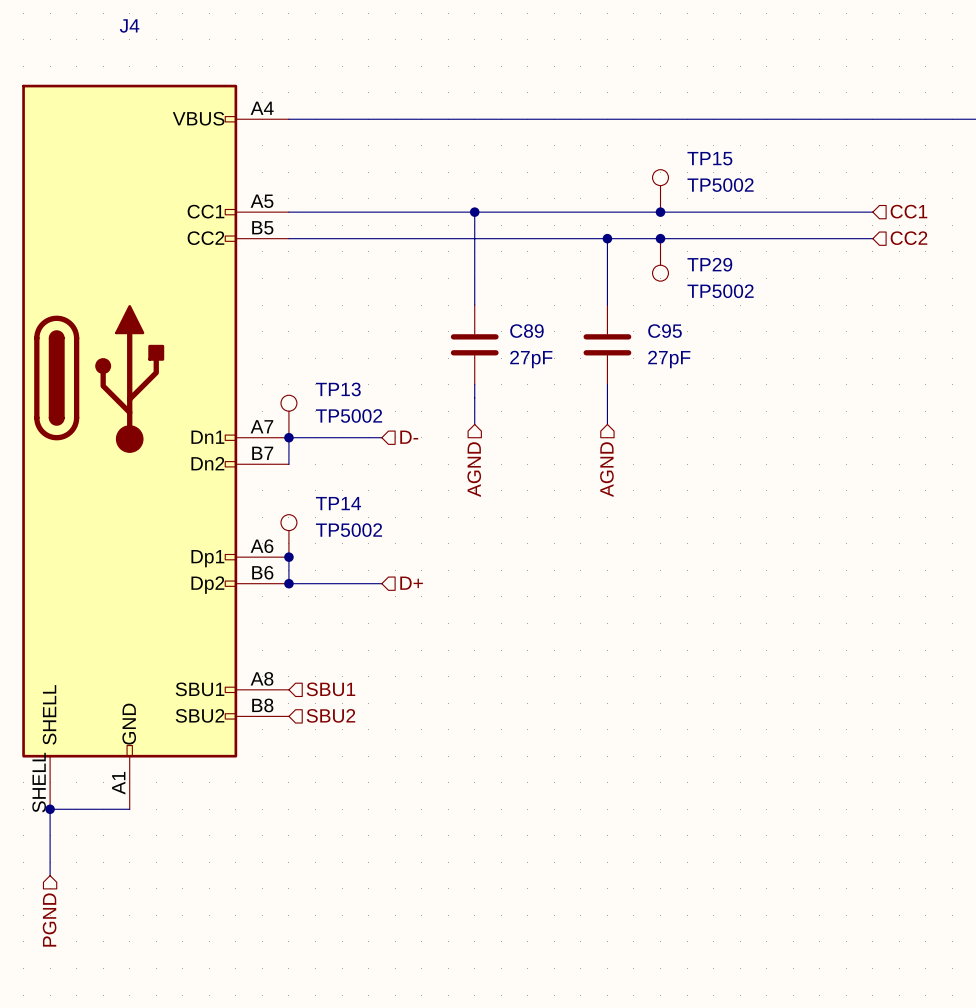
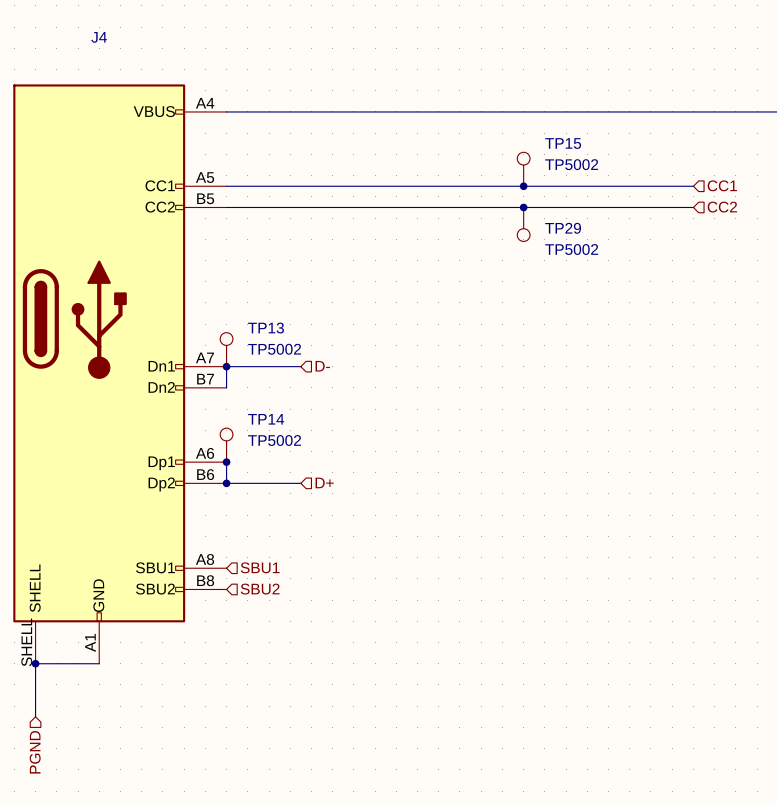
wire: (474, 212) (474, 305) -> none
junction: (474, 212) -> none
wire: (607, 238) (607, 305) -> none
junction: (607, 238) -> none
C89: 27pF (474, 344) -> none
C95: 27pF (607, 344) -> none
wire: (474, 384) (474, 424) -> none
wire: (607, 384) (607, 424) -> none
hierarchical label: AGND (474, 469) -> none
hierarchical label: AGND (606, 469) -> none

